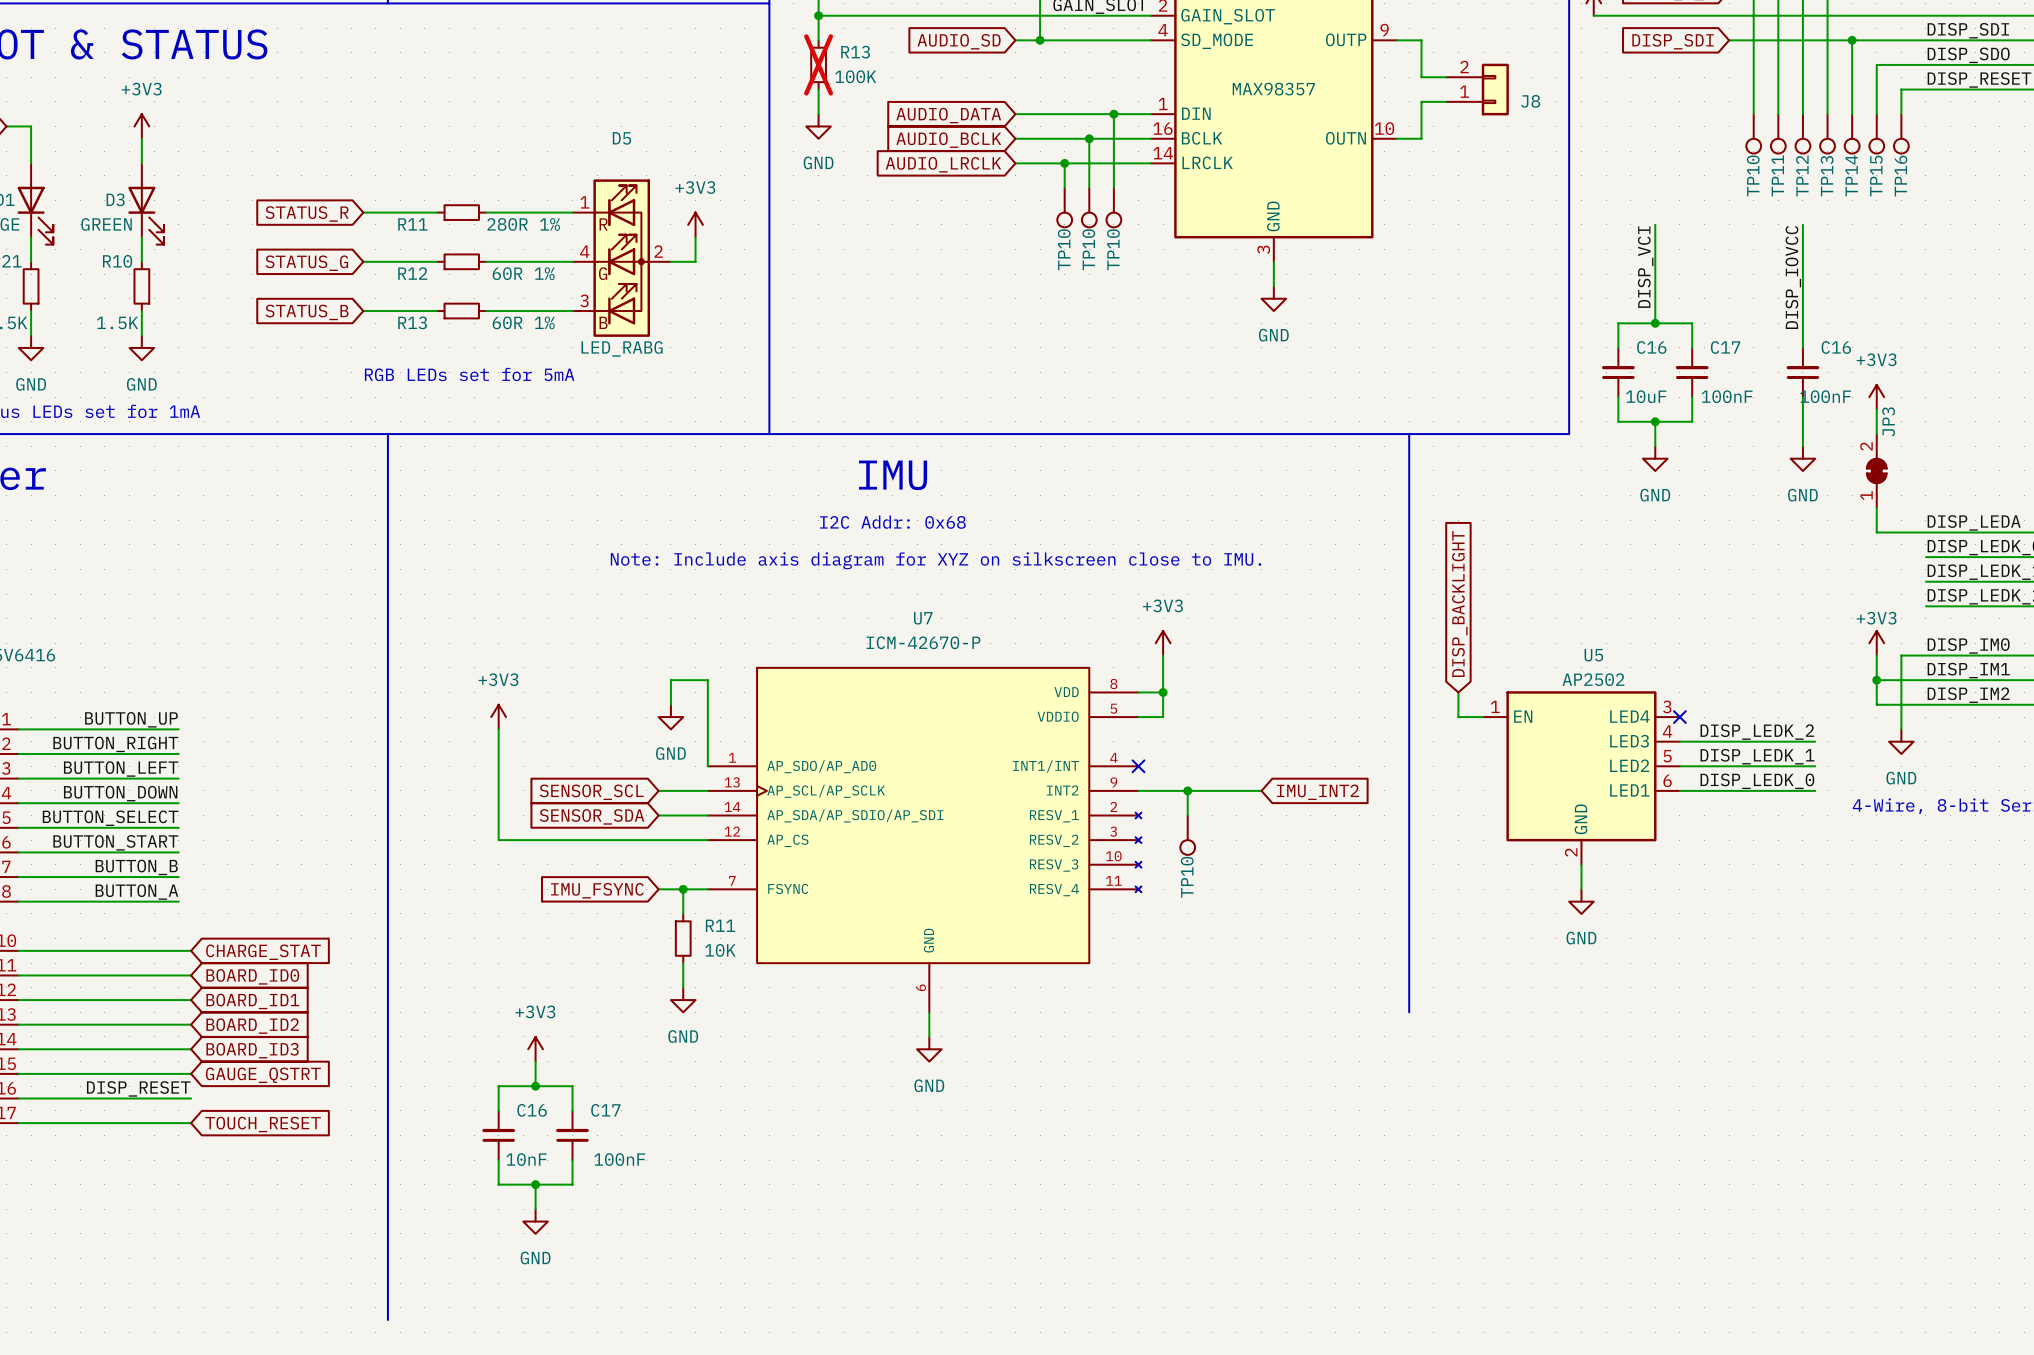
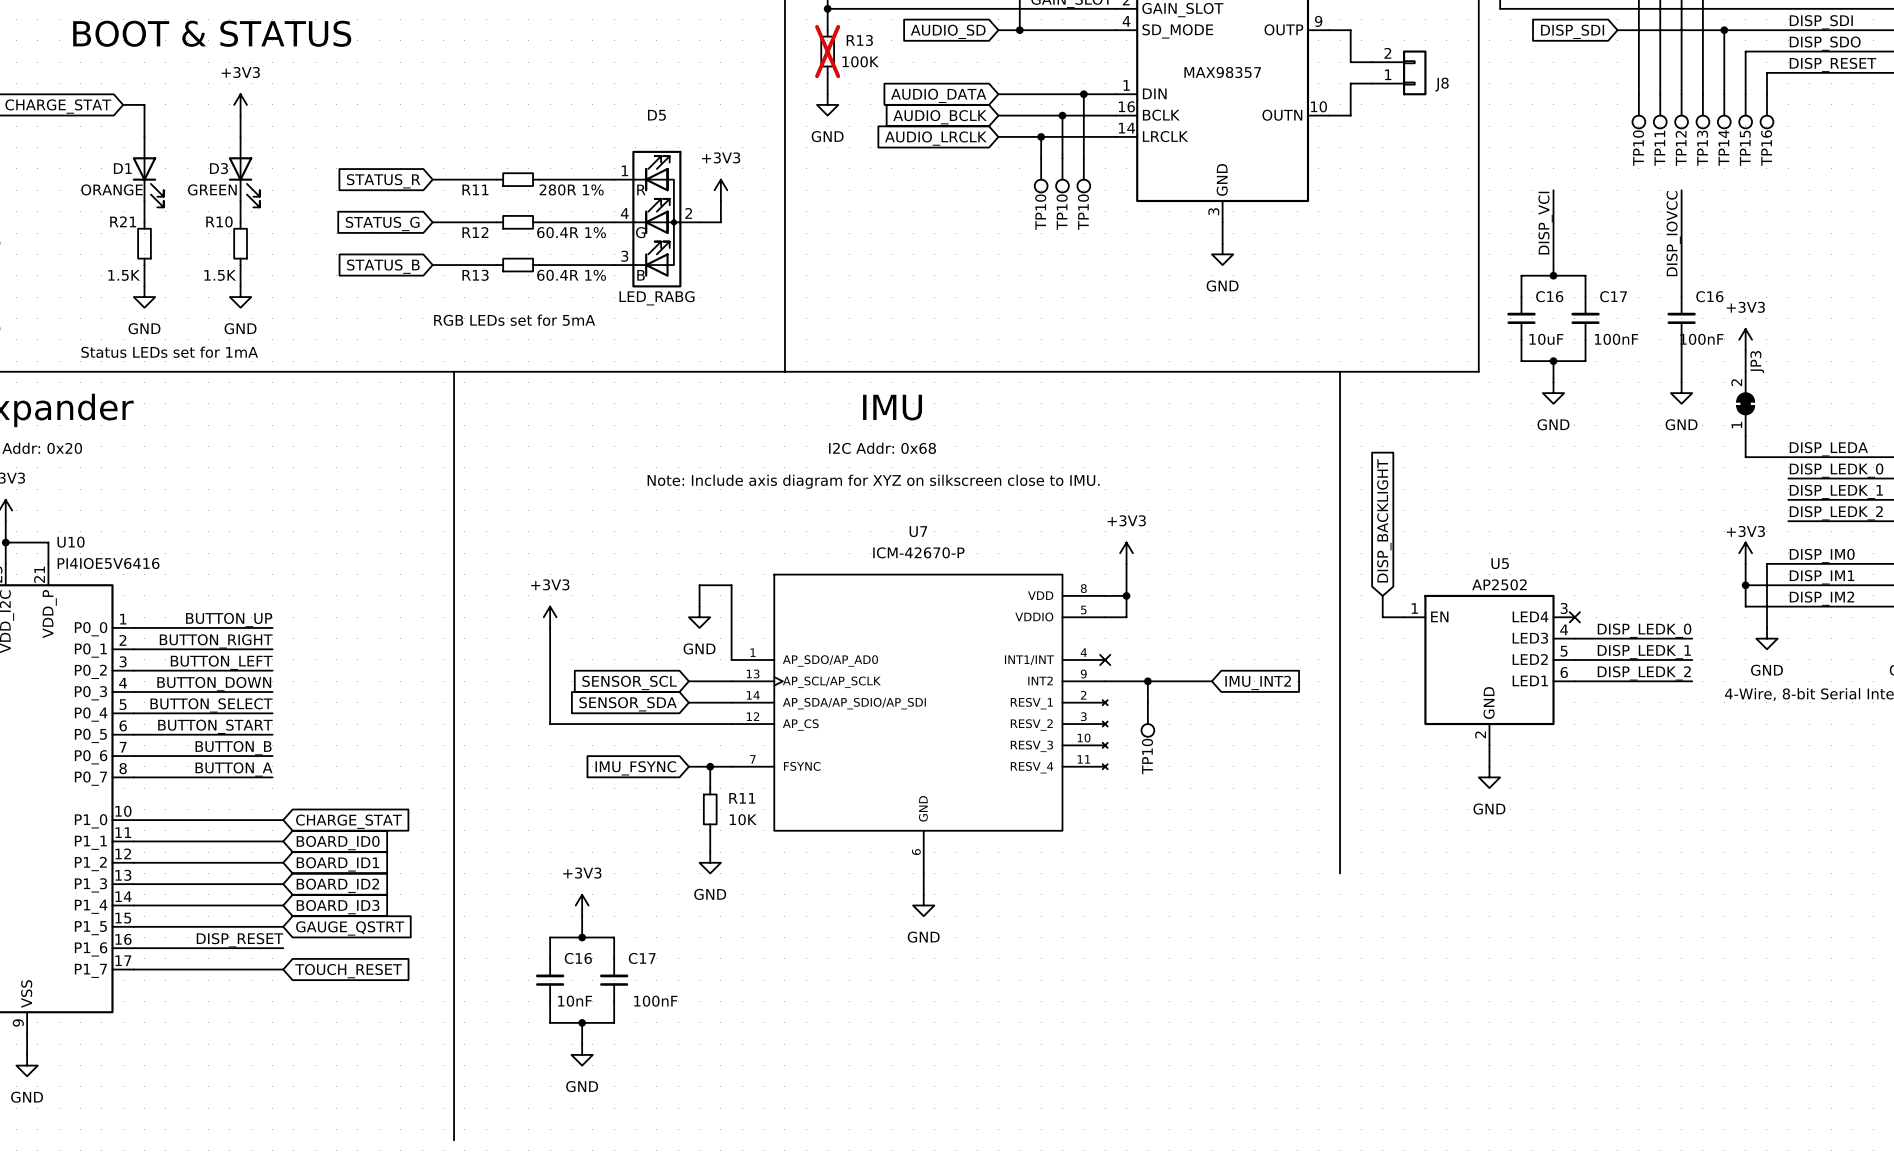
R12 value: 60R 1% (523, 273) -> 60.4R 1% (571, 232)
R13 value: 60R 1% (523, 322) -> 60.4R 1% (571, 275)
label: DISP_LEDK_2 (1757, 732) -> DISP_LEDK_0 (1644, 630)
label: DISP_LEDK_0 (1757, 781) -> DISP_LEDK_2 (1644, 673)

